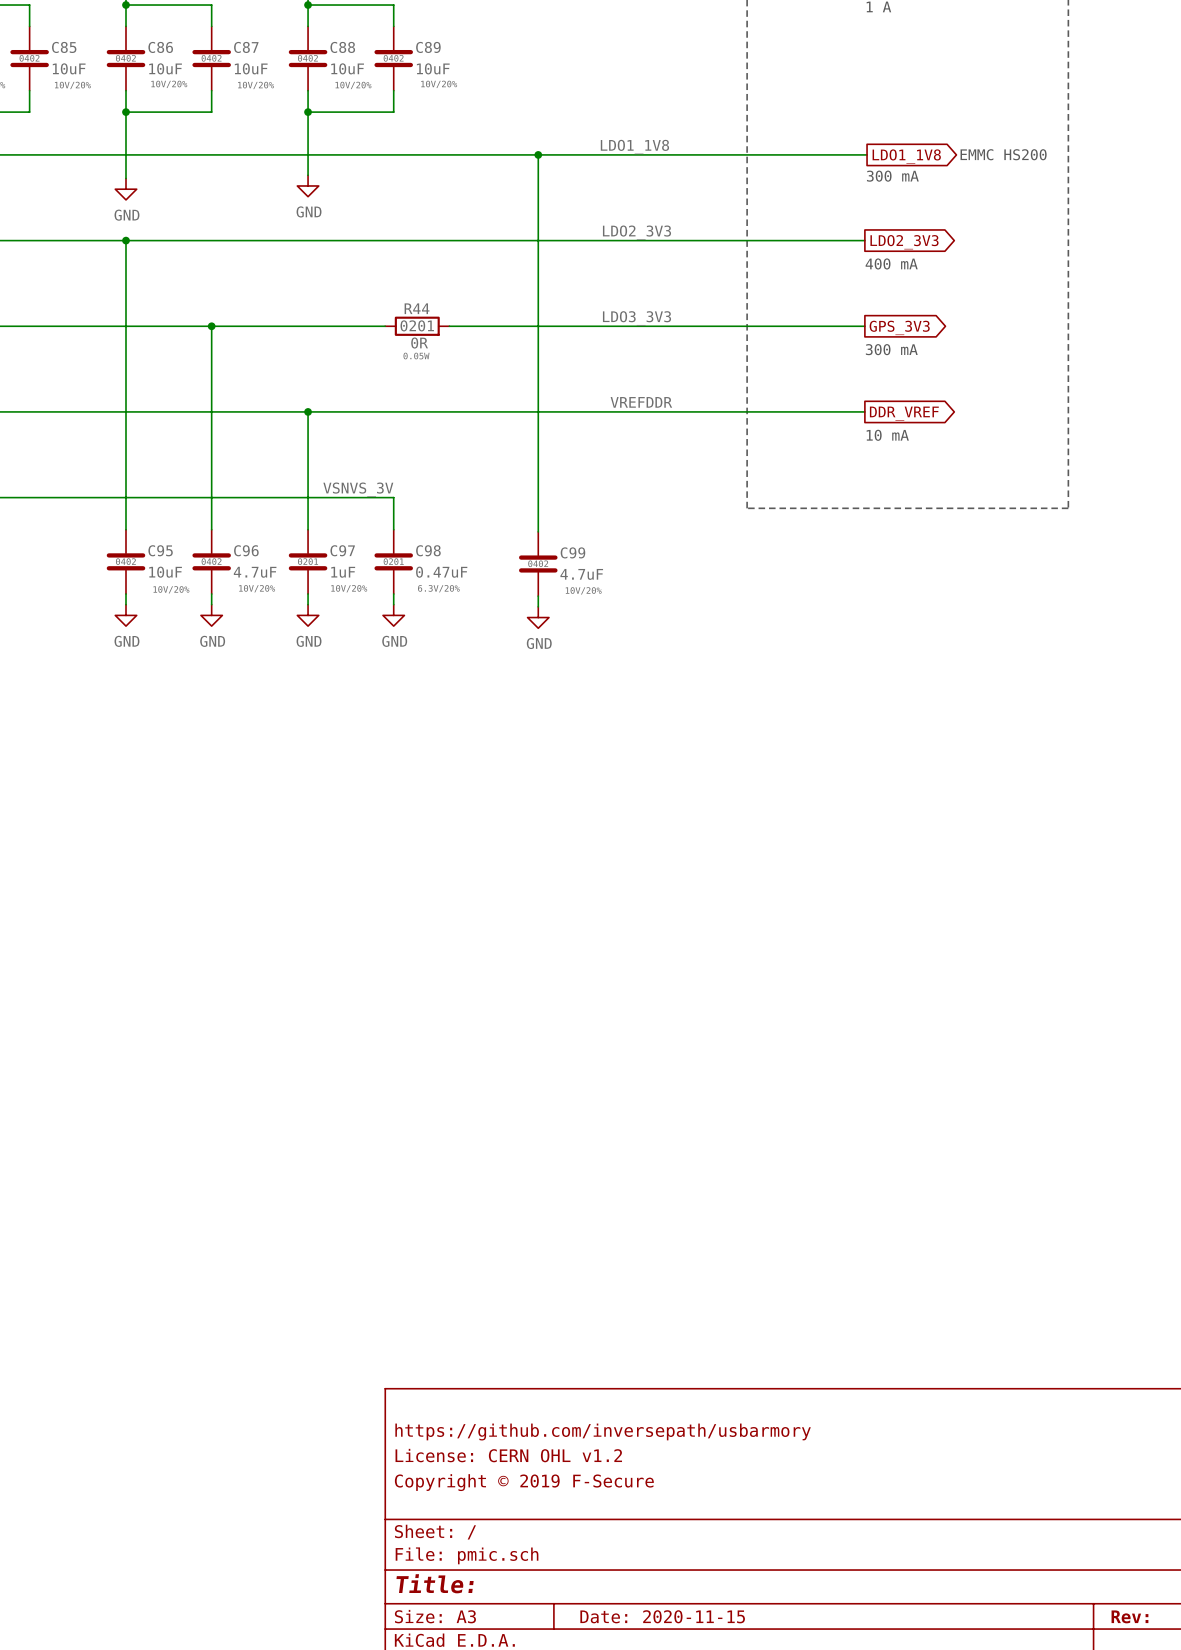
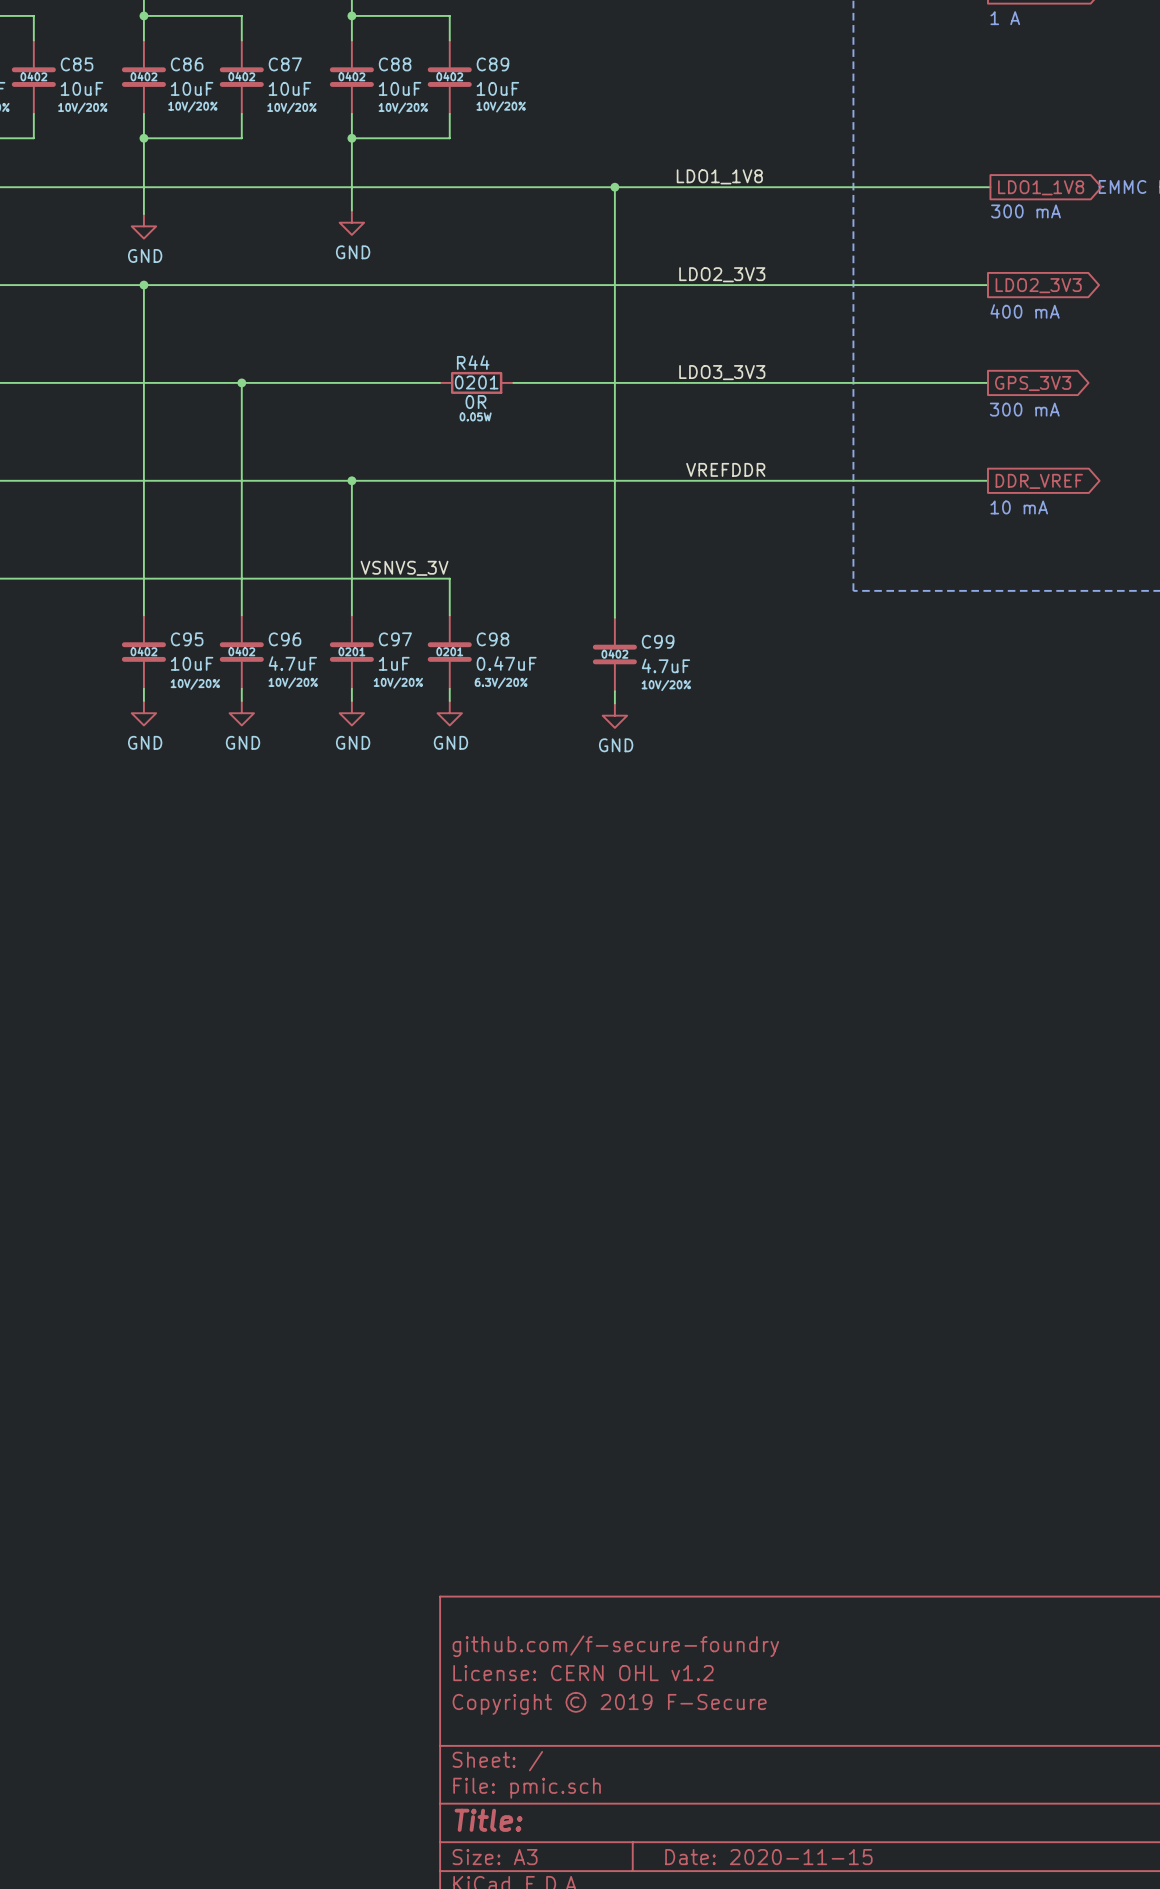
title block: https://github.com/inversepath/usbarmory (603, 1432) -> github.com/f-secure-foundry (615, 1646)

